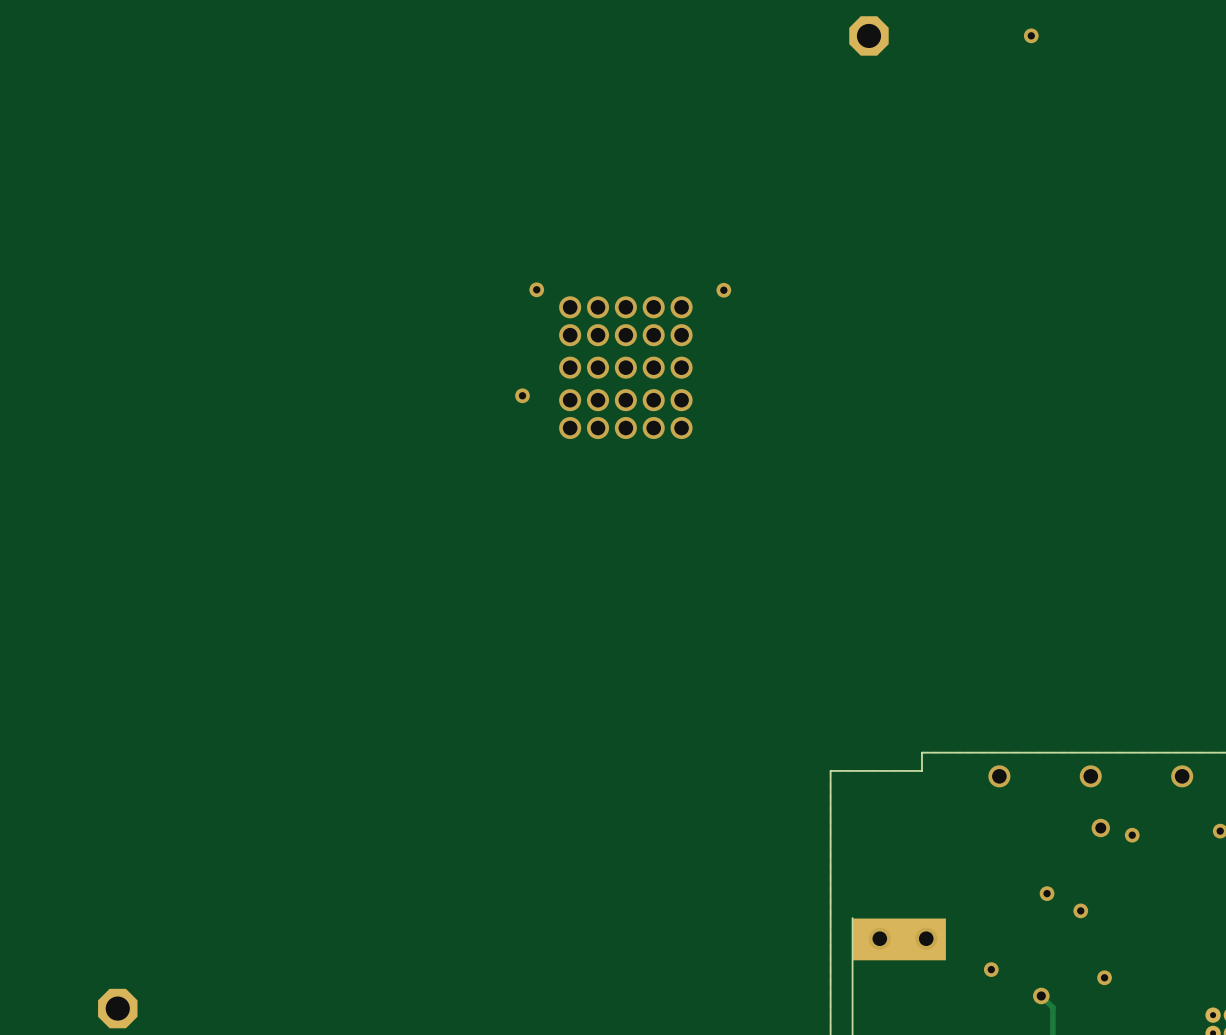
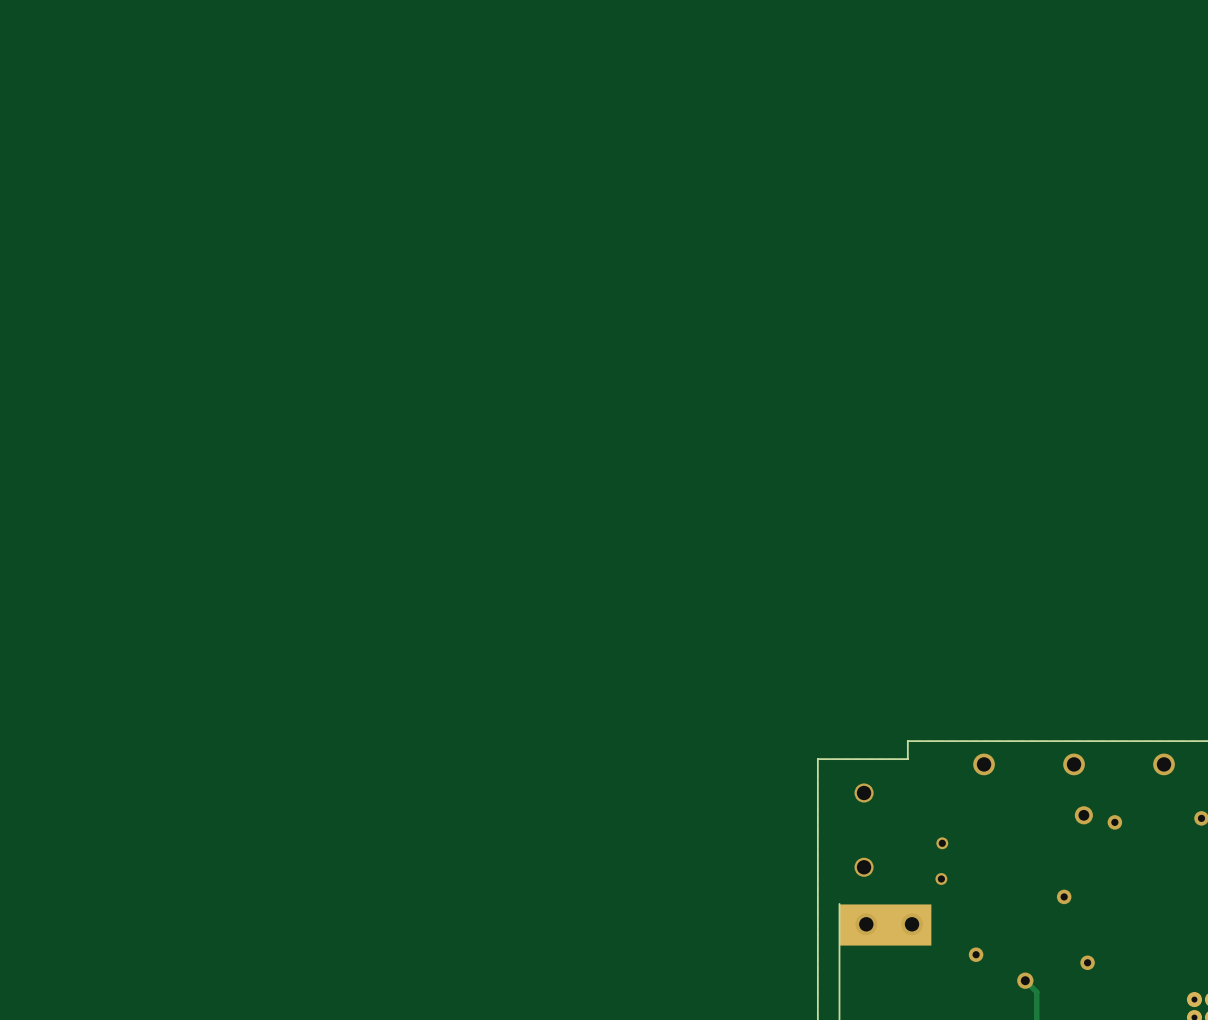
part: (868, 35) -> none
via: (1031, 35) -> none
via: (536, 289) -> none
via: (723, 290) -> none
via: (570, 307) -> none
via: (598, 307) -> none
via: (625, 307) -> none
via: (653, 307) -> none
via: (681, 307) -> none
via: (570, 335) -> none
via: (598, 335) -> none
via: (625, 335) -> none
via: (653, 335) -> none
via: (681, 335) -> none
via: (570, 367) -> none
via: (598, 367) -> none
via: (625, 367) -> none
via: (653, 367) -> none
via: (681, 367) -> none
via: (522, 395) -> none
via: (570, 400) -> none
via: (598, 400) -> none
via: (625, 400) -> none
via: (653, 400) -> none
via: (681, 400) -> none
via: (570, 428) -> none
via: (598, 428) -> none
via: (625, 428) -> none
via: (653, 428) -> none
via: (681, 428) -> none
via: none -> (864, 793)
via: none -> (942, 843)
via: none -> (864, 867)
via: none -> (941, 878)
via: (1047, 893) -> none
part: (117, 1008) -> none

